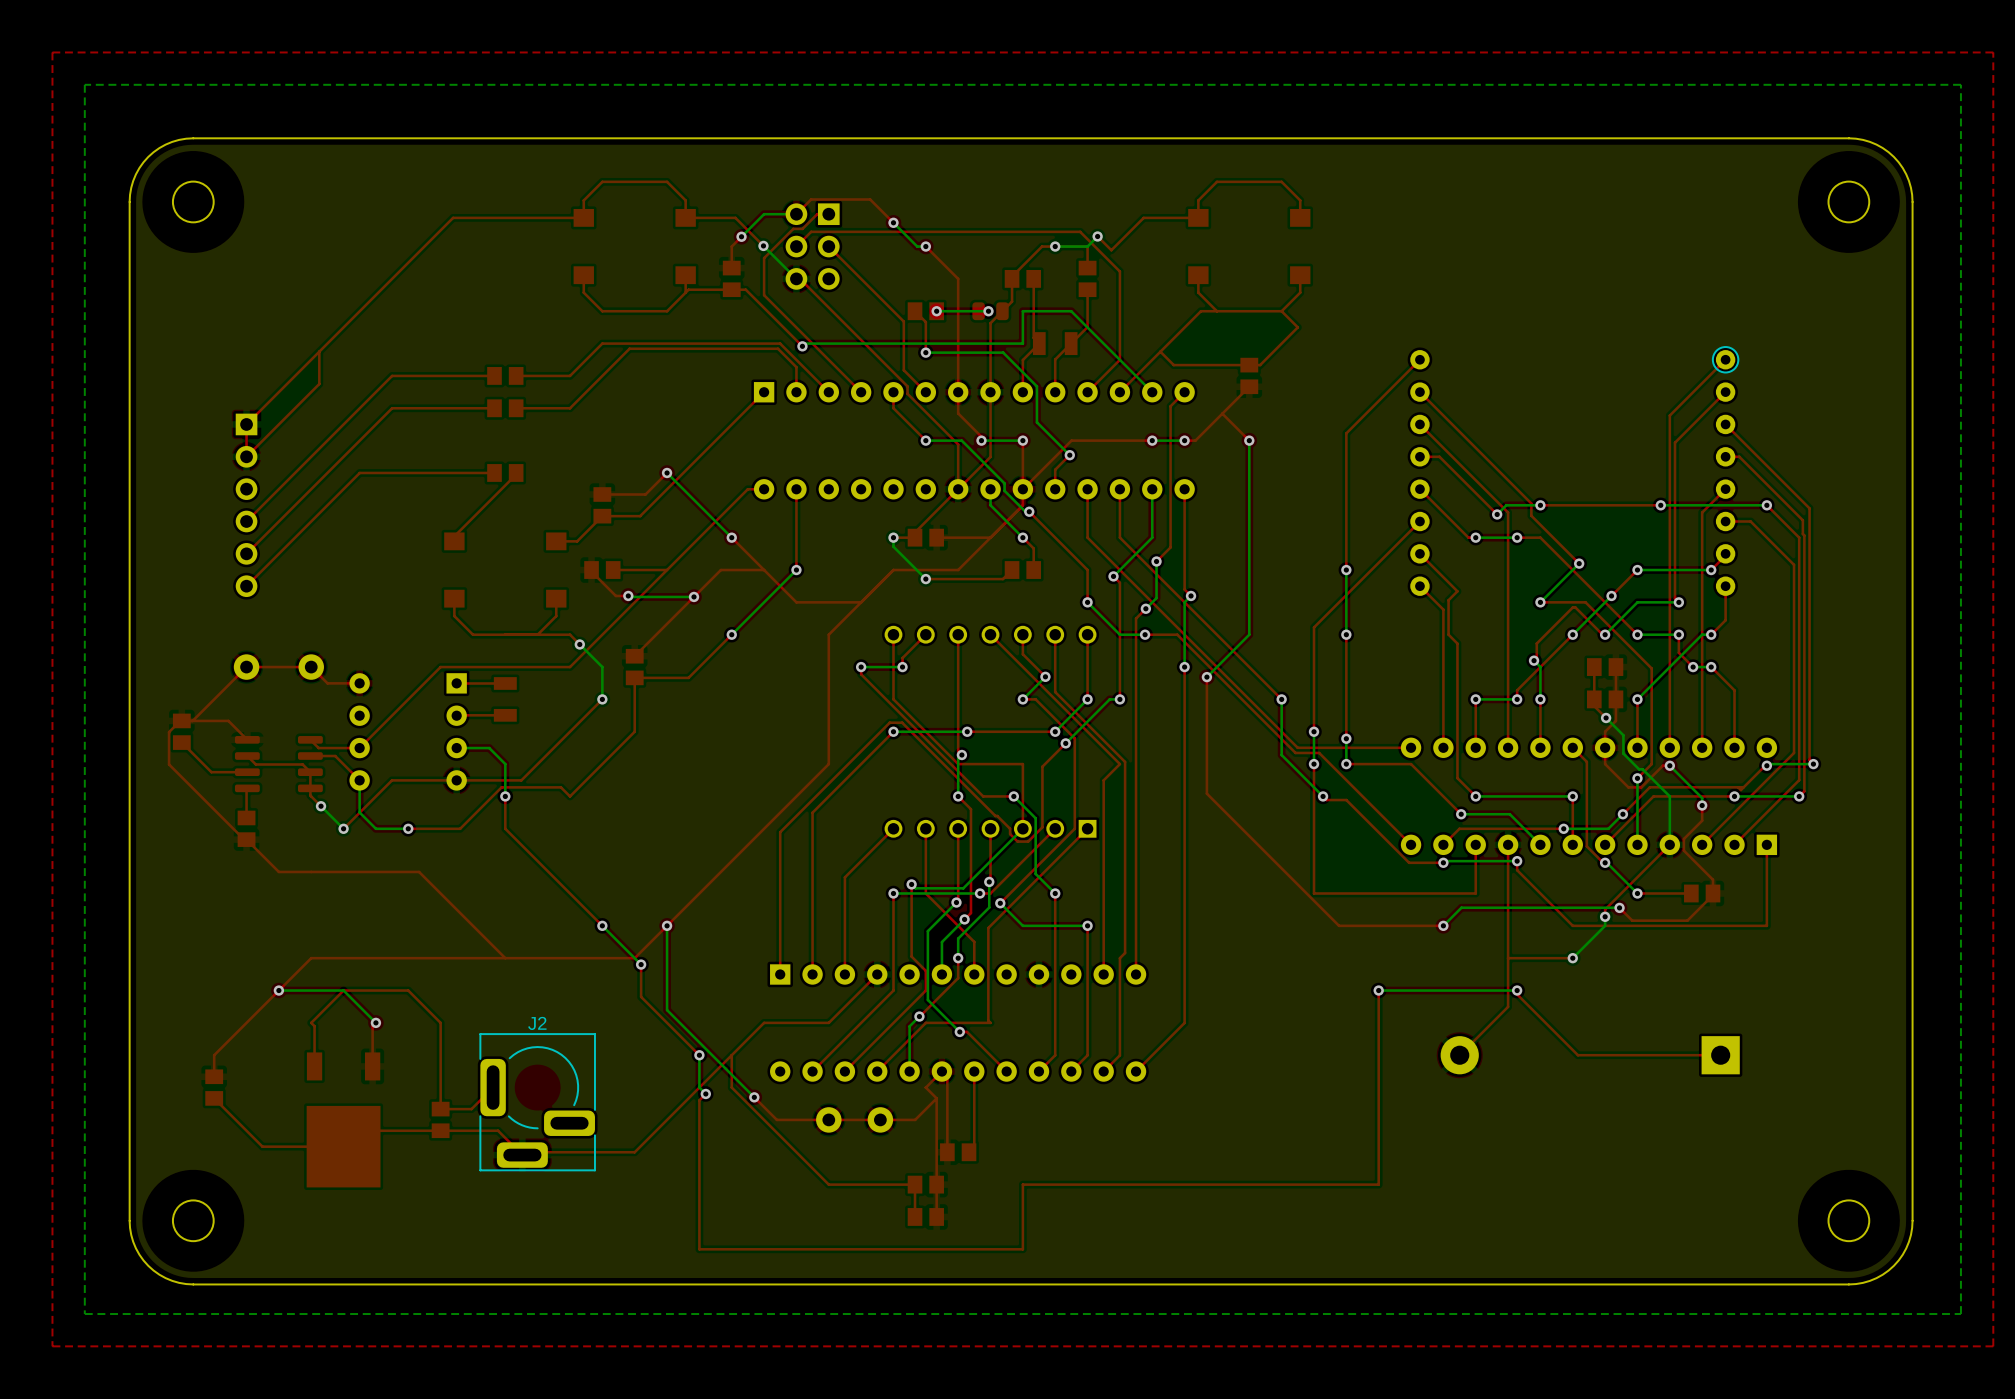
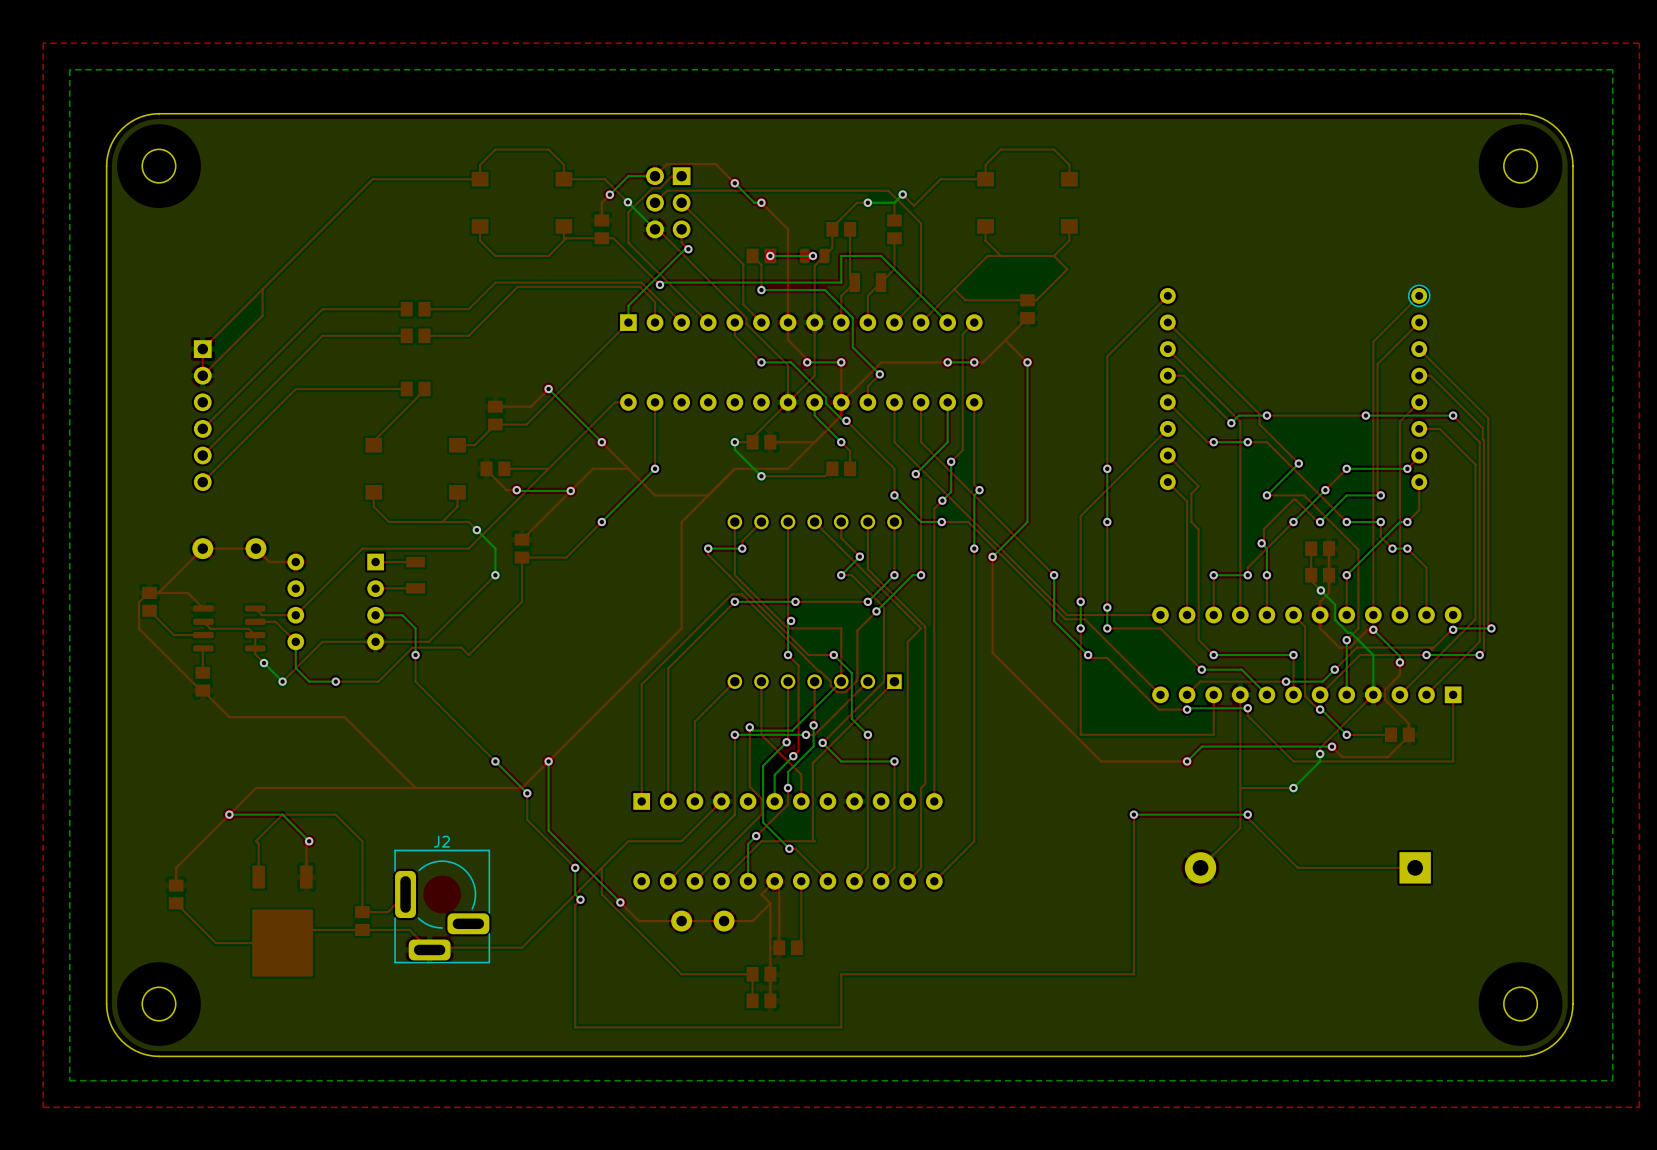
top track: none -> (681, 229) (681, 242) (688, 249)
bottom track: none -> (688, 249) (685, 249) (628, 305) (628, 322)
via: none -> (688, 249)

